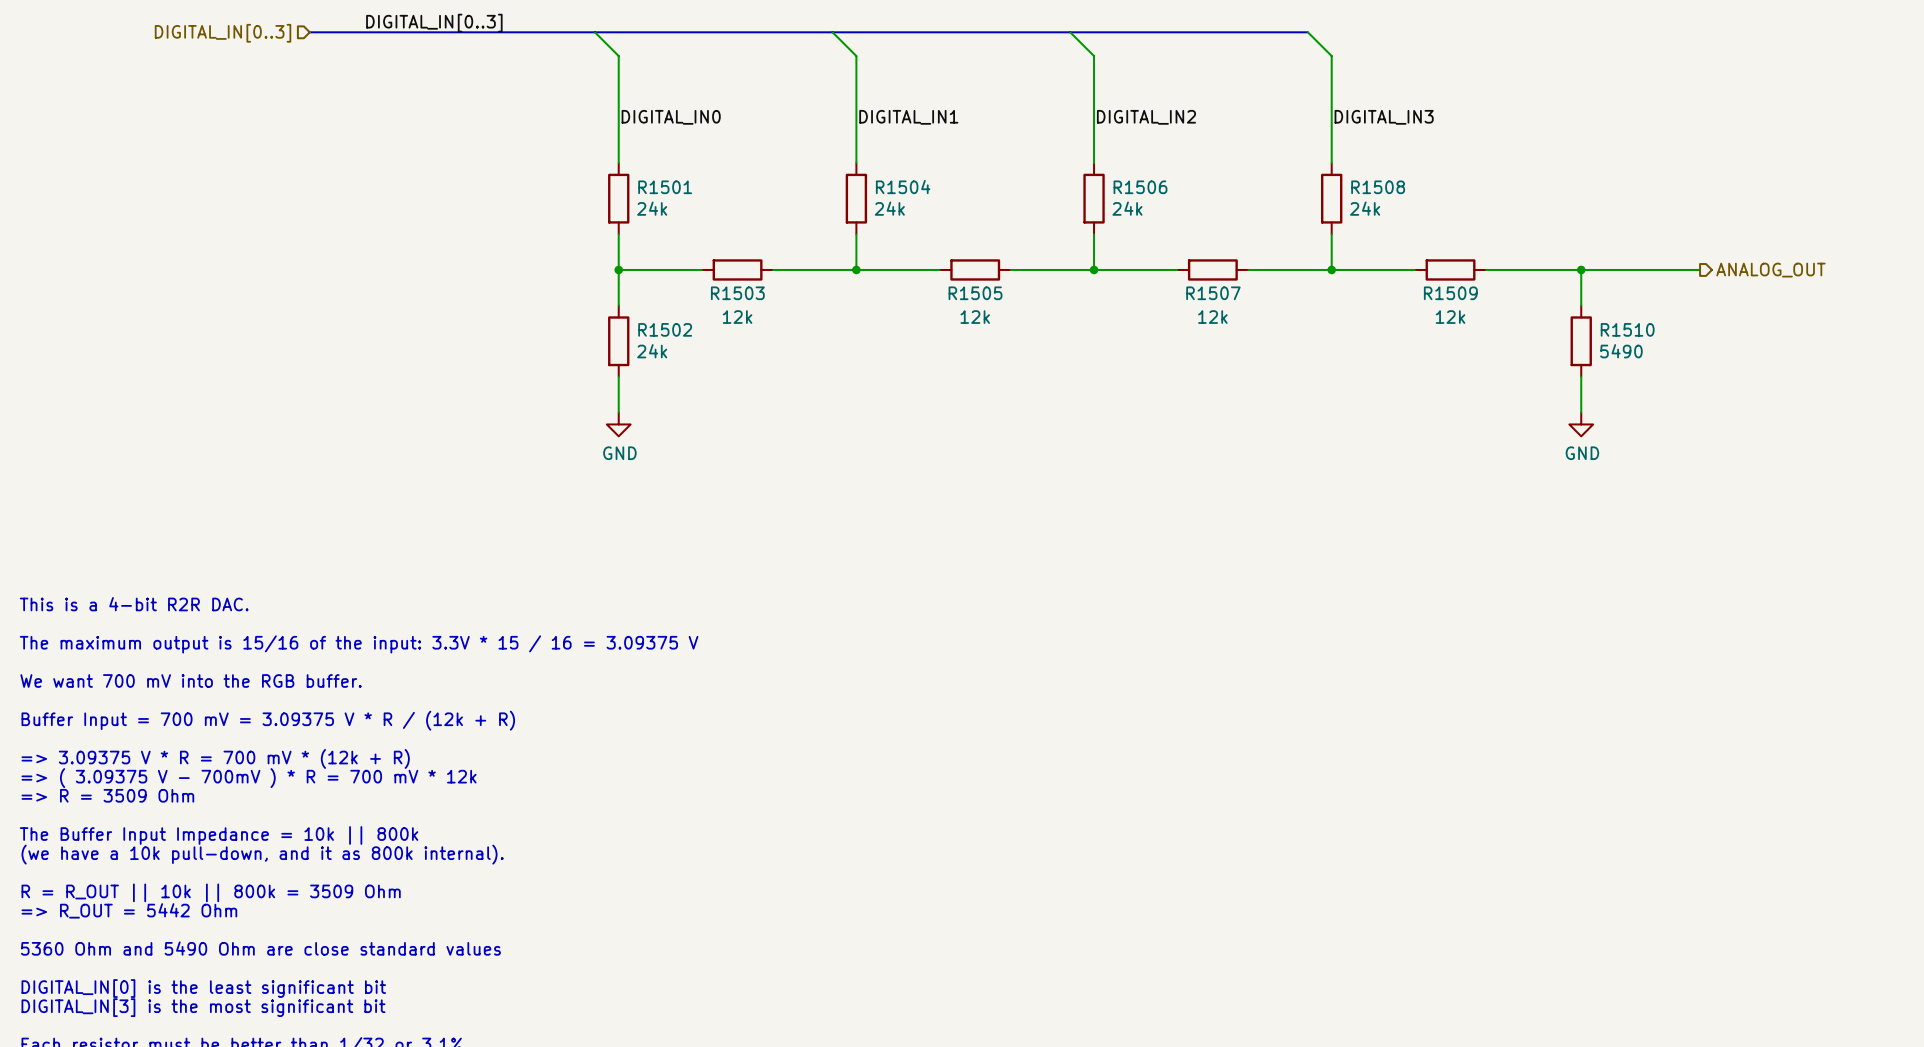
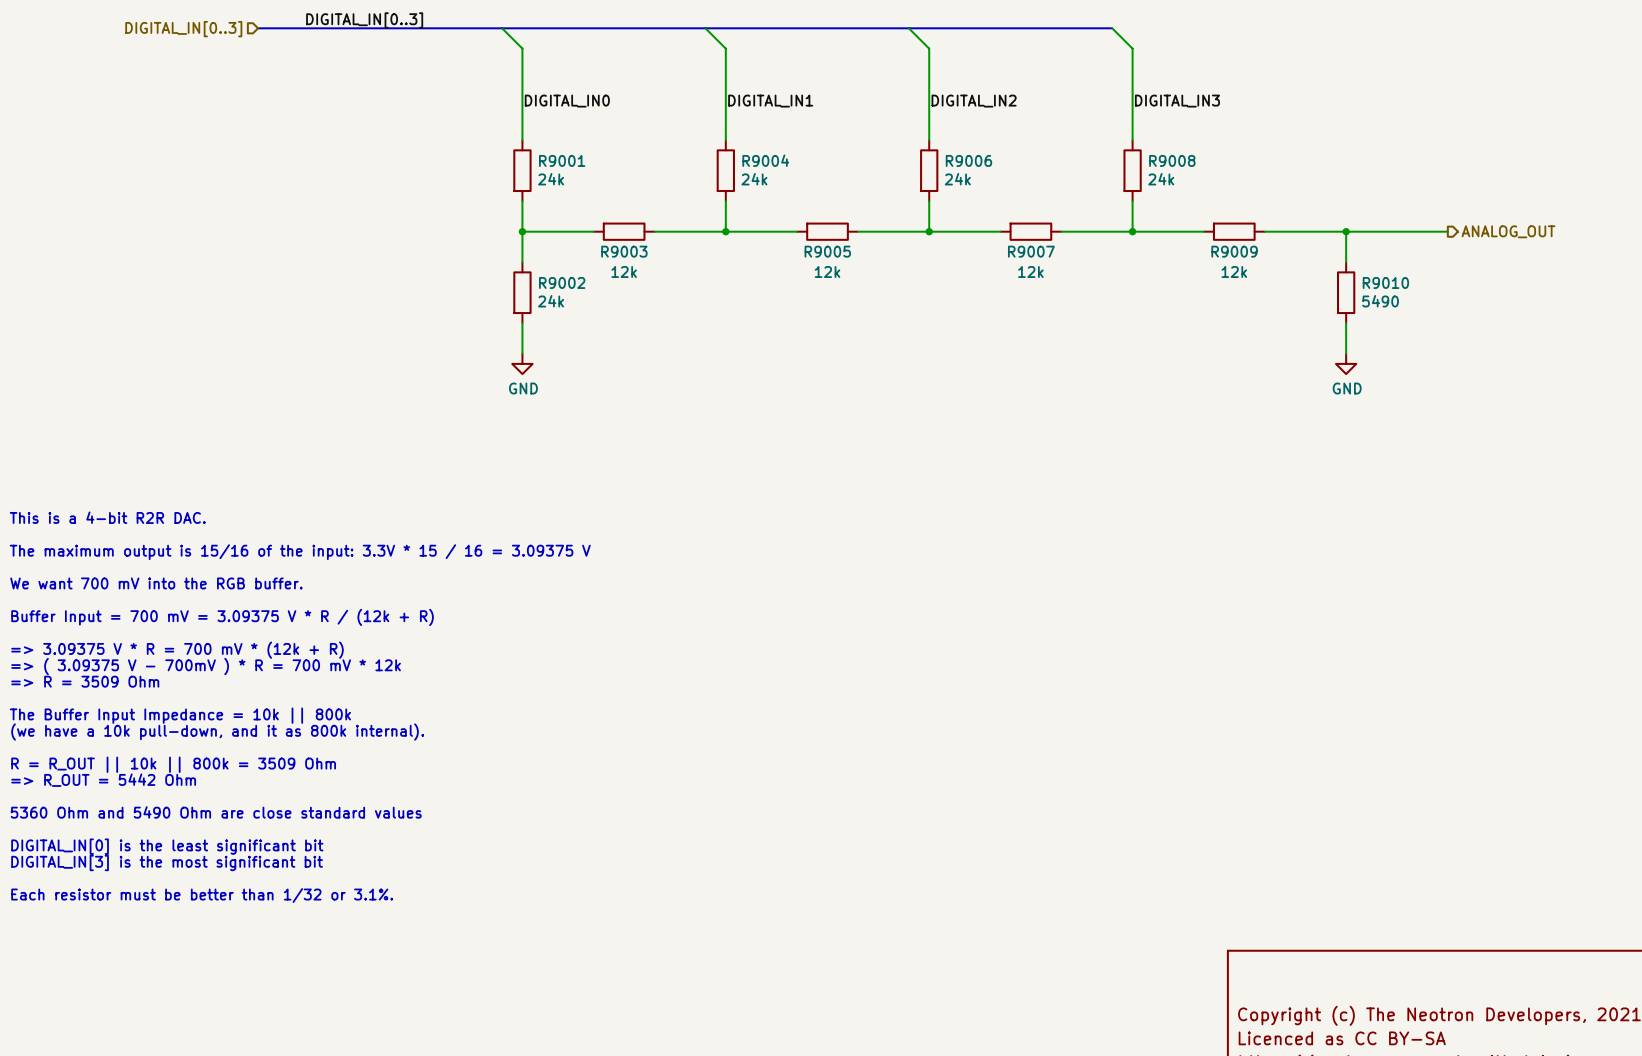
R1501 name: R1501 (665, 187) -> R9001 (562, 160)
R1504 name: R1504 (903, 187) -> R9004 (765, 160)
R1506 name: R1506 (1140, 187) -> R9006 (968, 160)
R1508 name: R1508 (1378, 187) -> R9008 (1172, 160)
R1503 name: R1503 (737, 293) -> R9003 (624, 251)
R1505 name: R1505 (975, 293) -> R9005 (827, 251)
R1507 name: R1507 (1213, 293) -> R9007 (1031, 251)
R1509 name: R1509 (1450, 293) -> R9009 (1234, 251)
R1502 name: R1502 (665, 329) -> R9002 (562, 282)
R1510 name: R1510 (1627, 329) -> R9010 (1385, 282)

